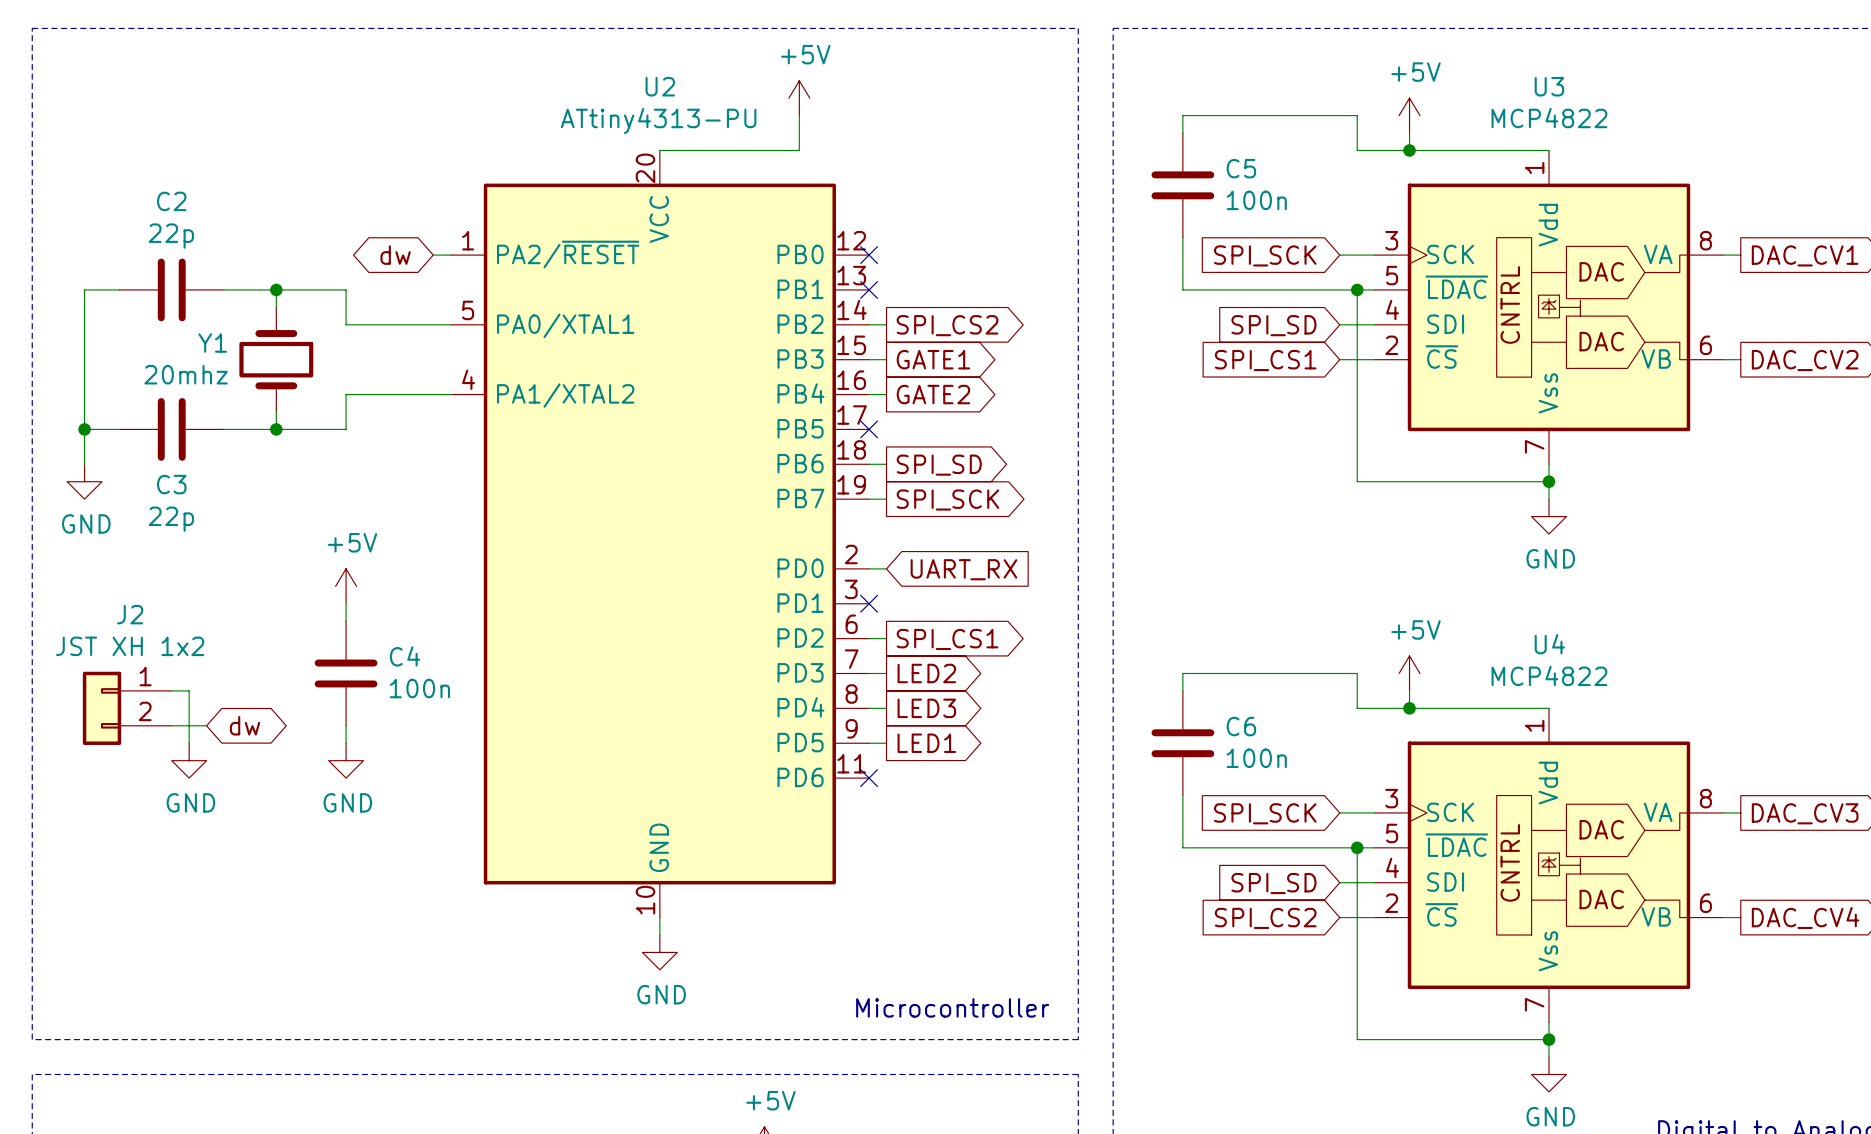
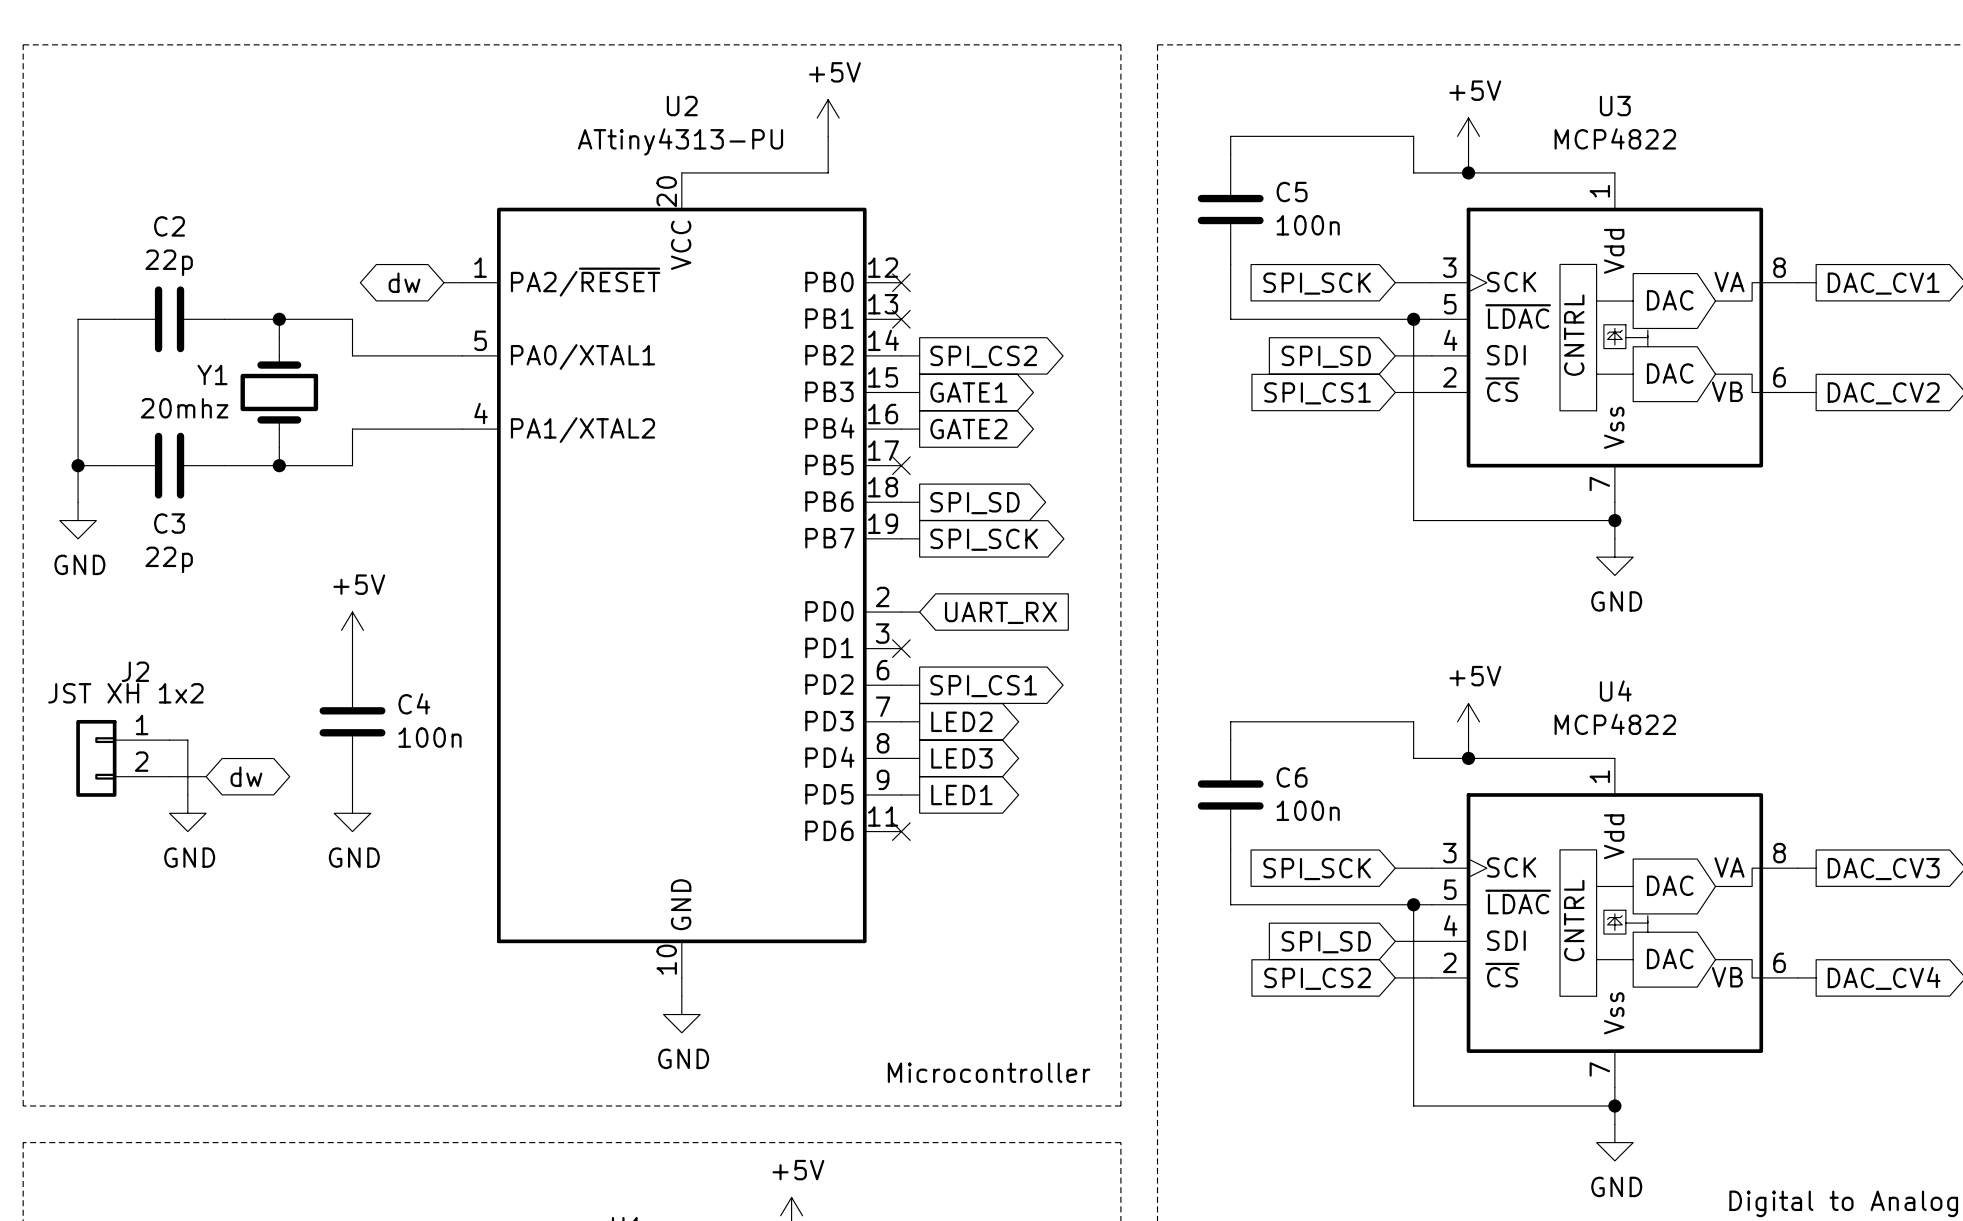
J2 name position: J2 (130, 614) -> J2 (135, 671)

